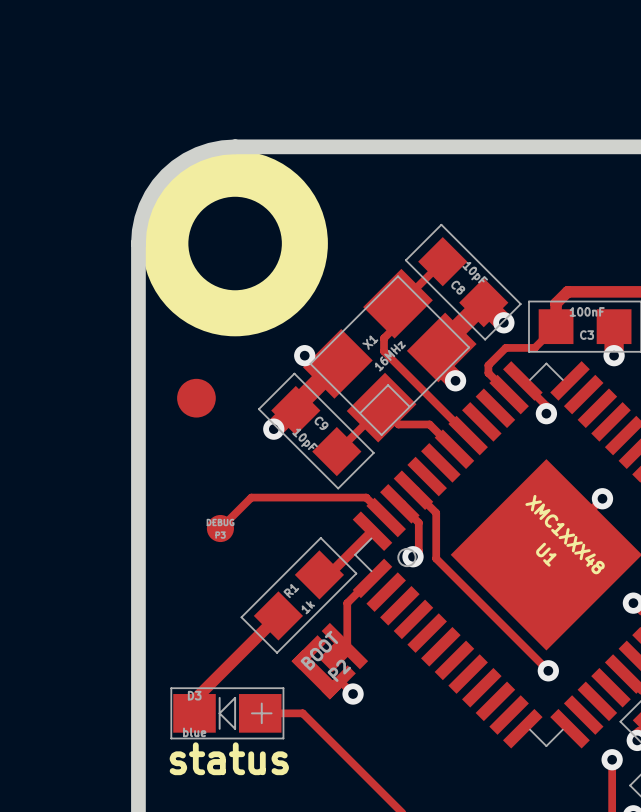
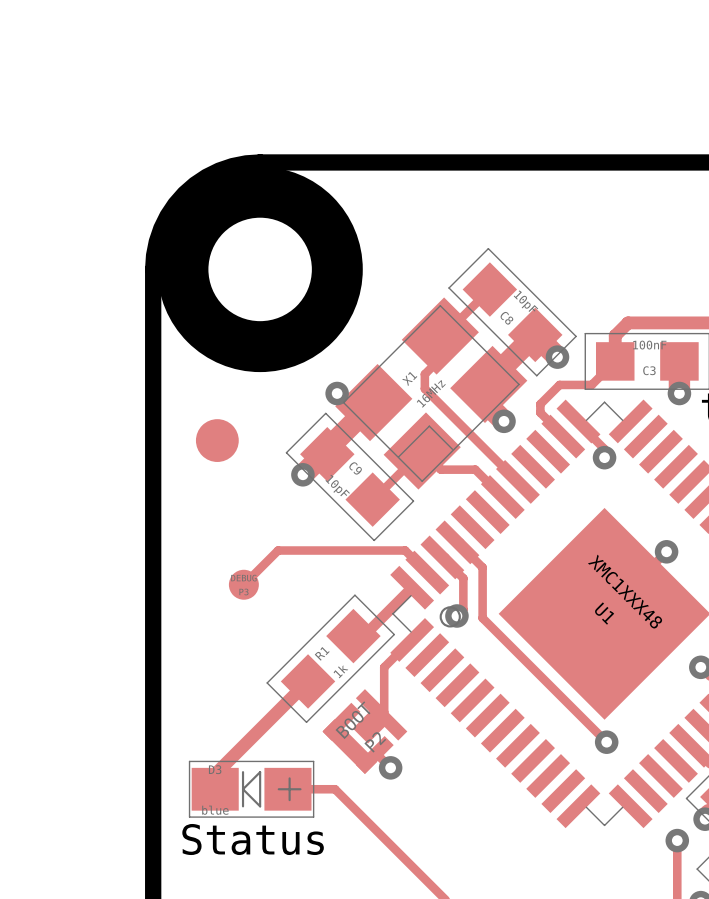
text: status (229, 758) -> Status (253, 839)

